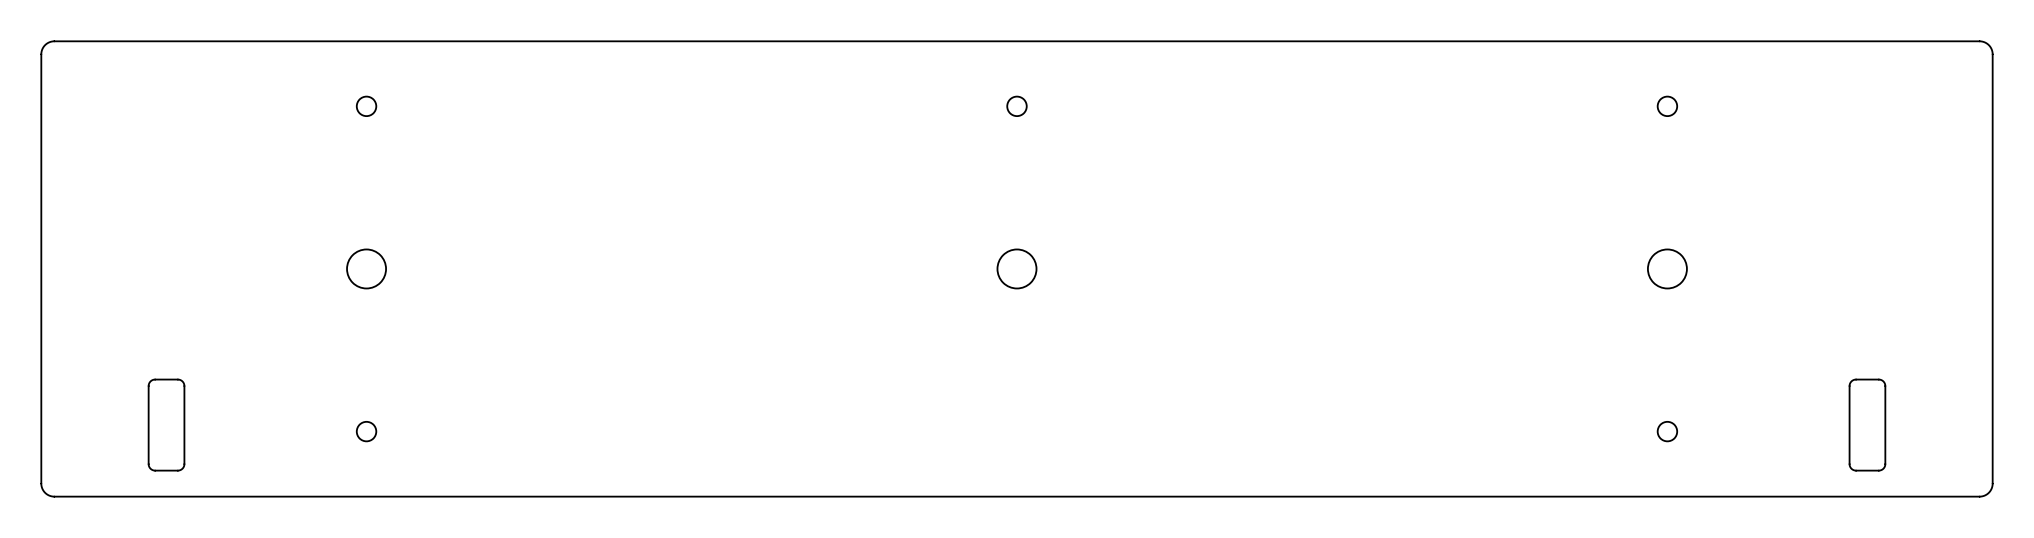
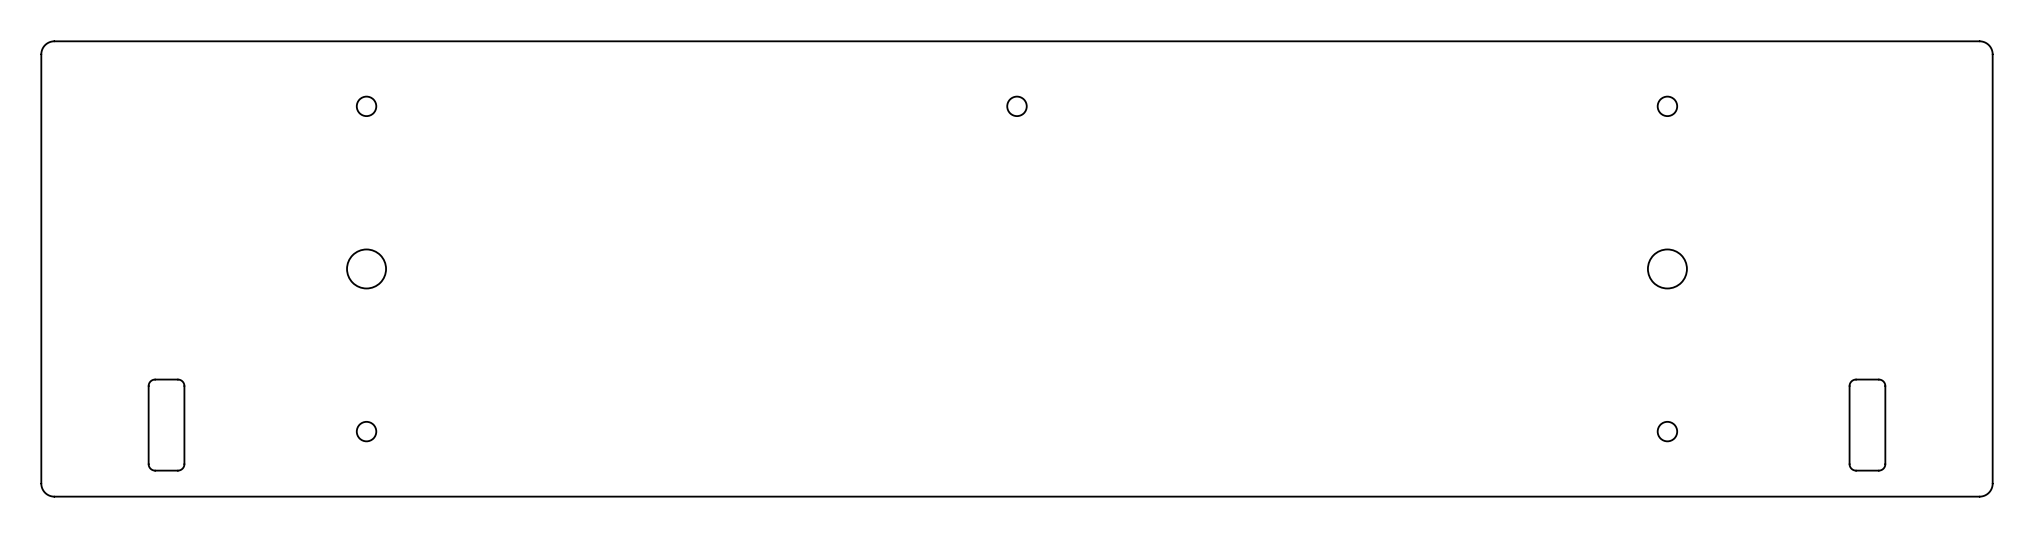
round board edge: [997, 249, 1037, 289] -> none

